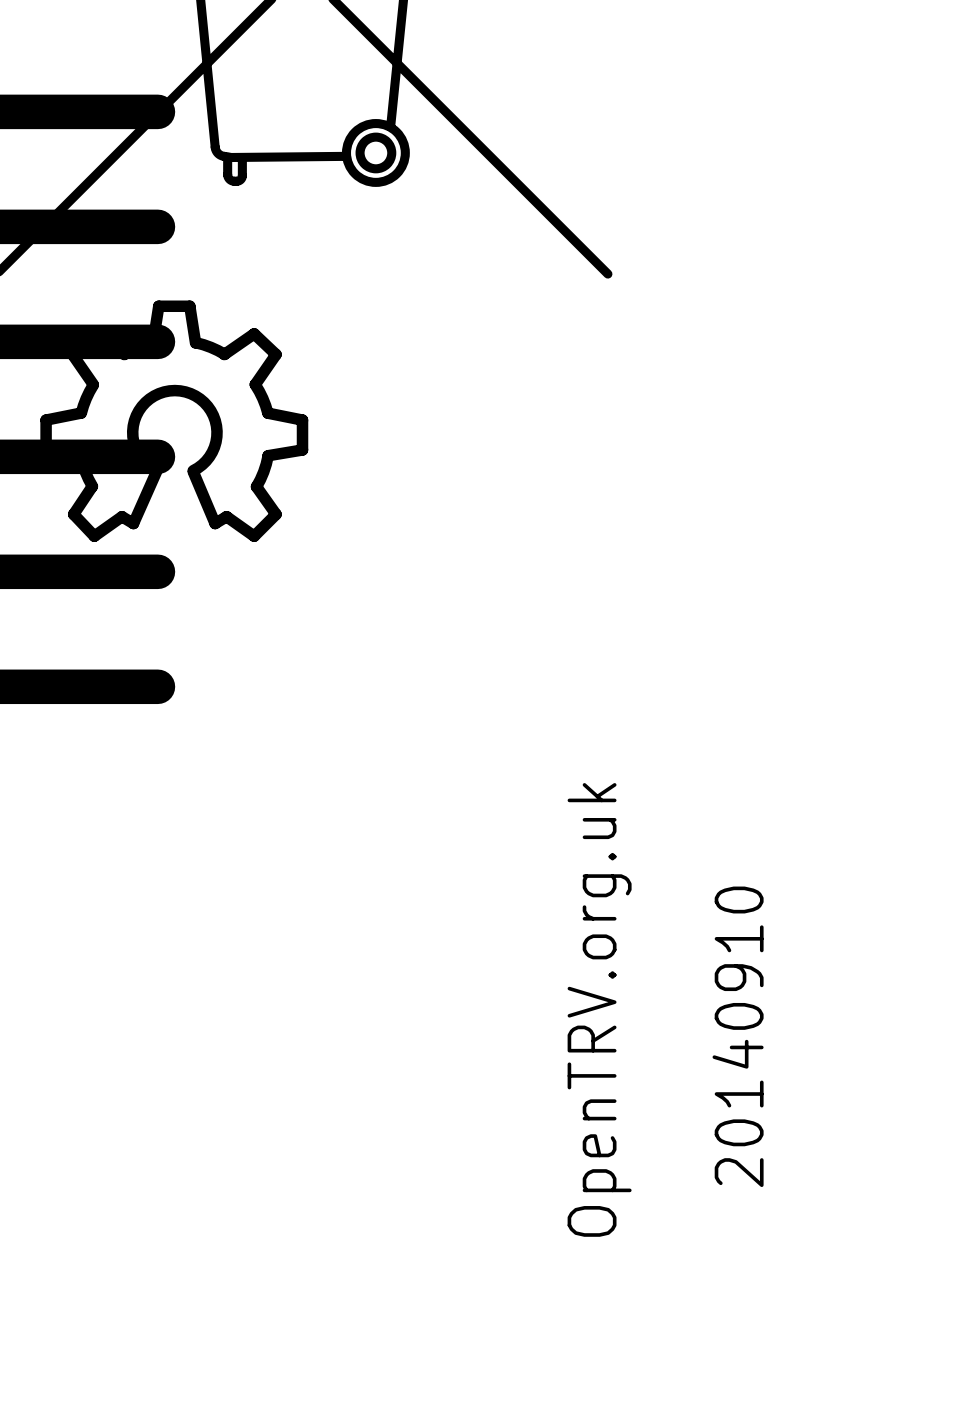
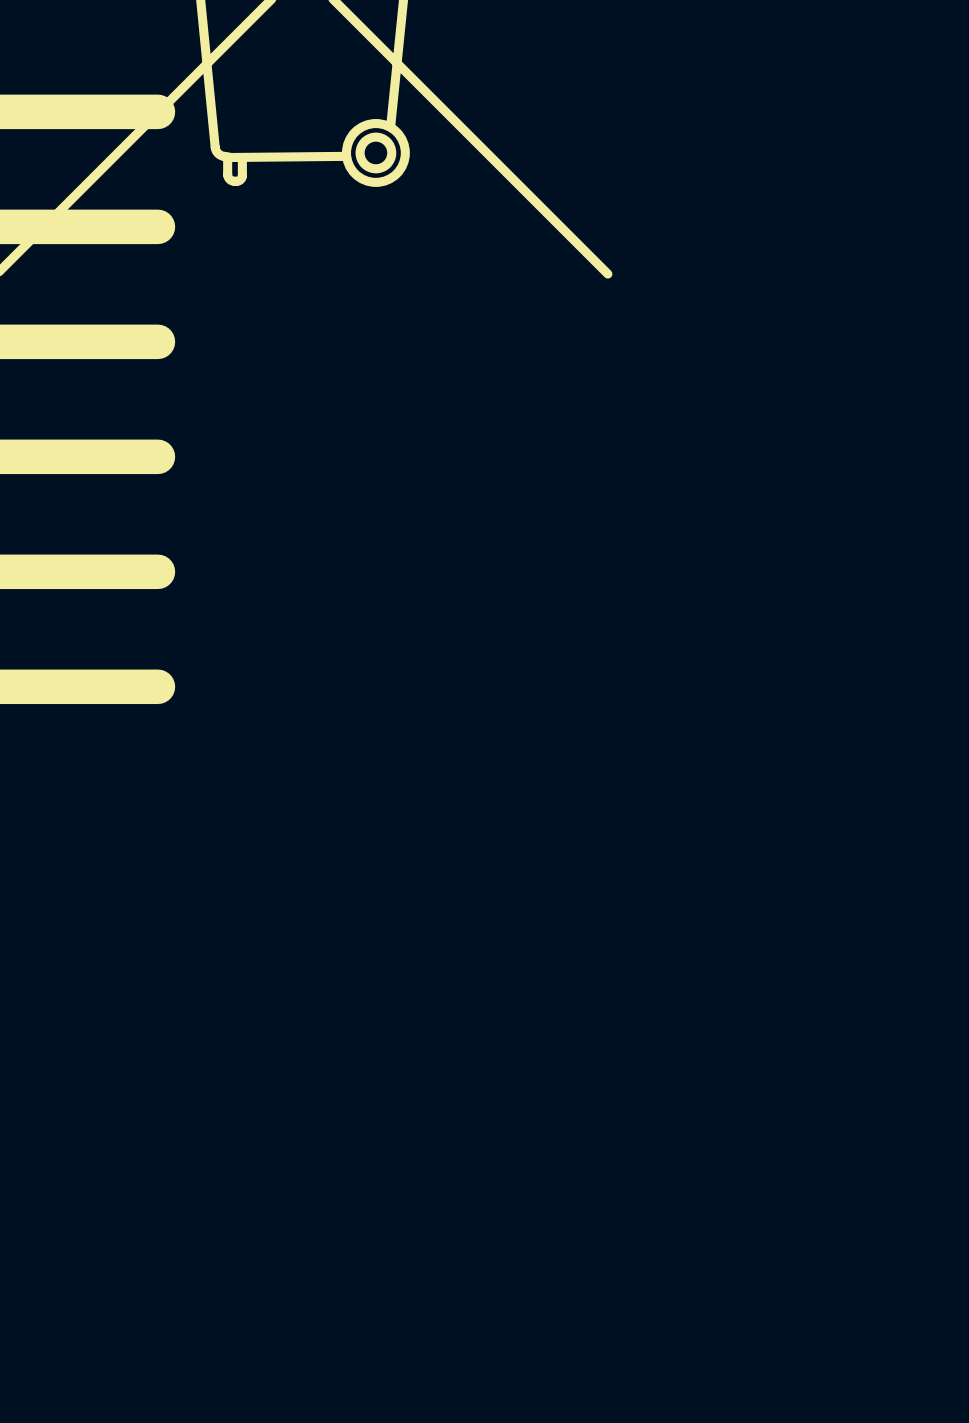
drawing: [40, 300, 309, 542] -> none
text: OpenTRV.org.uk (599, 1009) -> none
text: 20140910 (738, 1036) -> none

